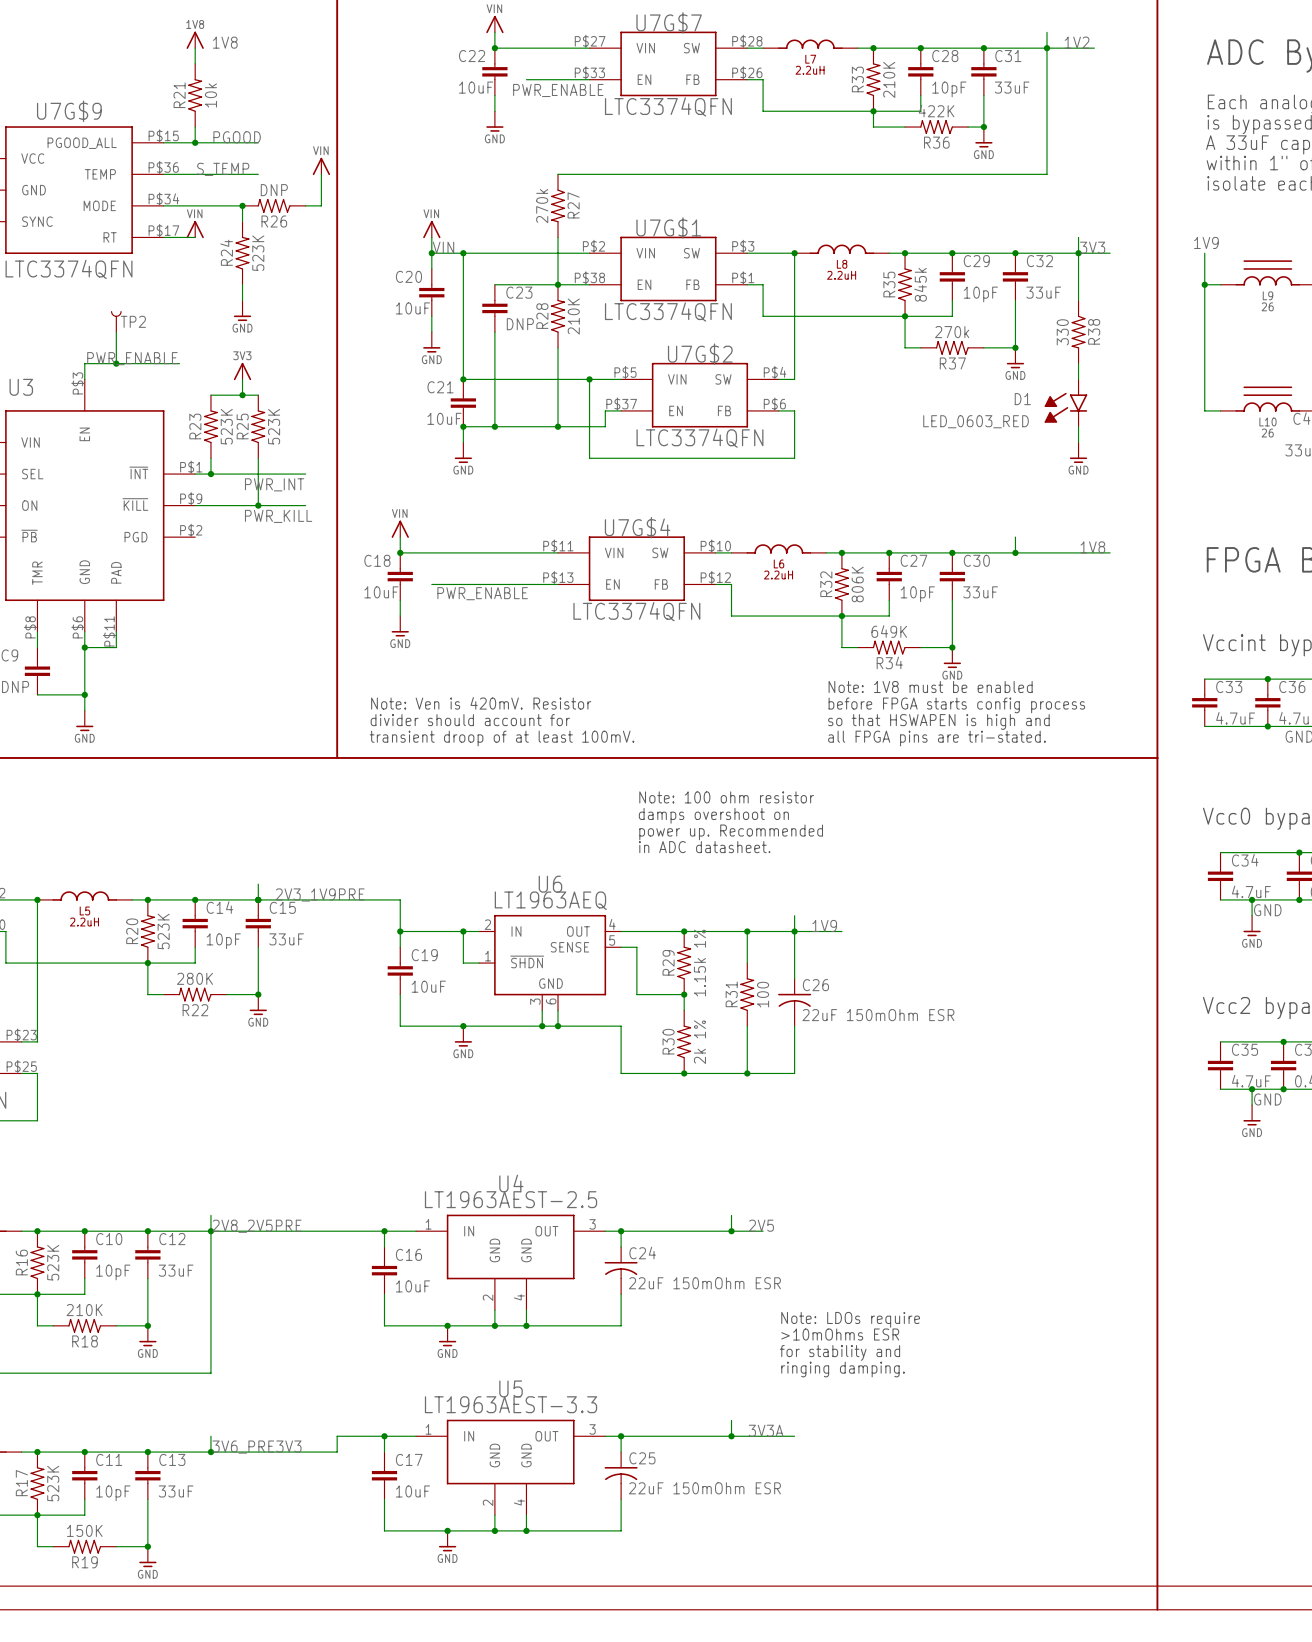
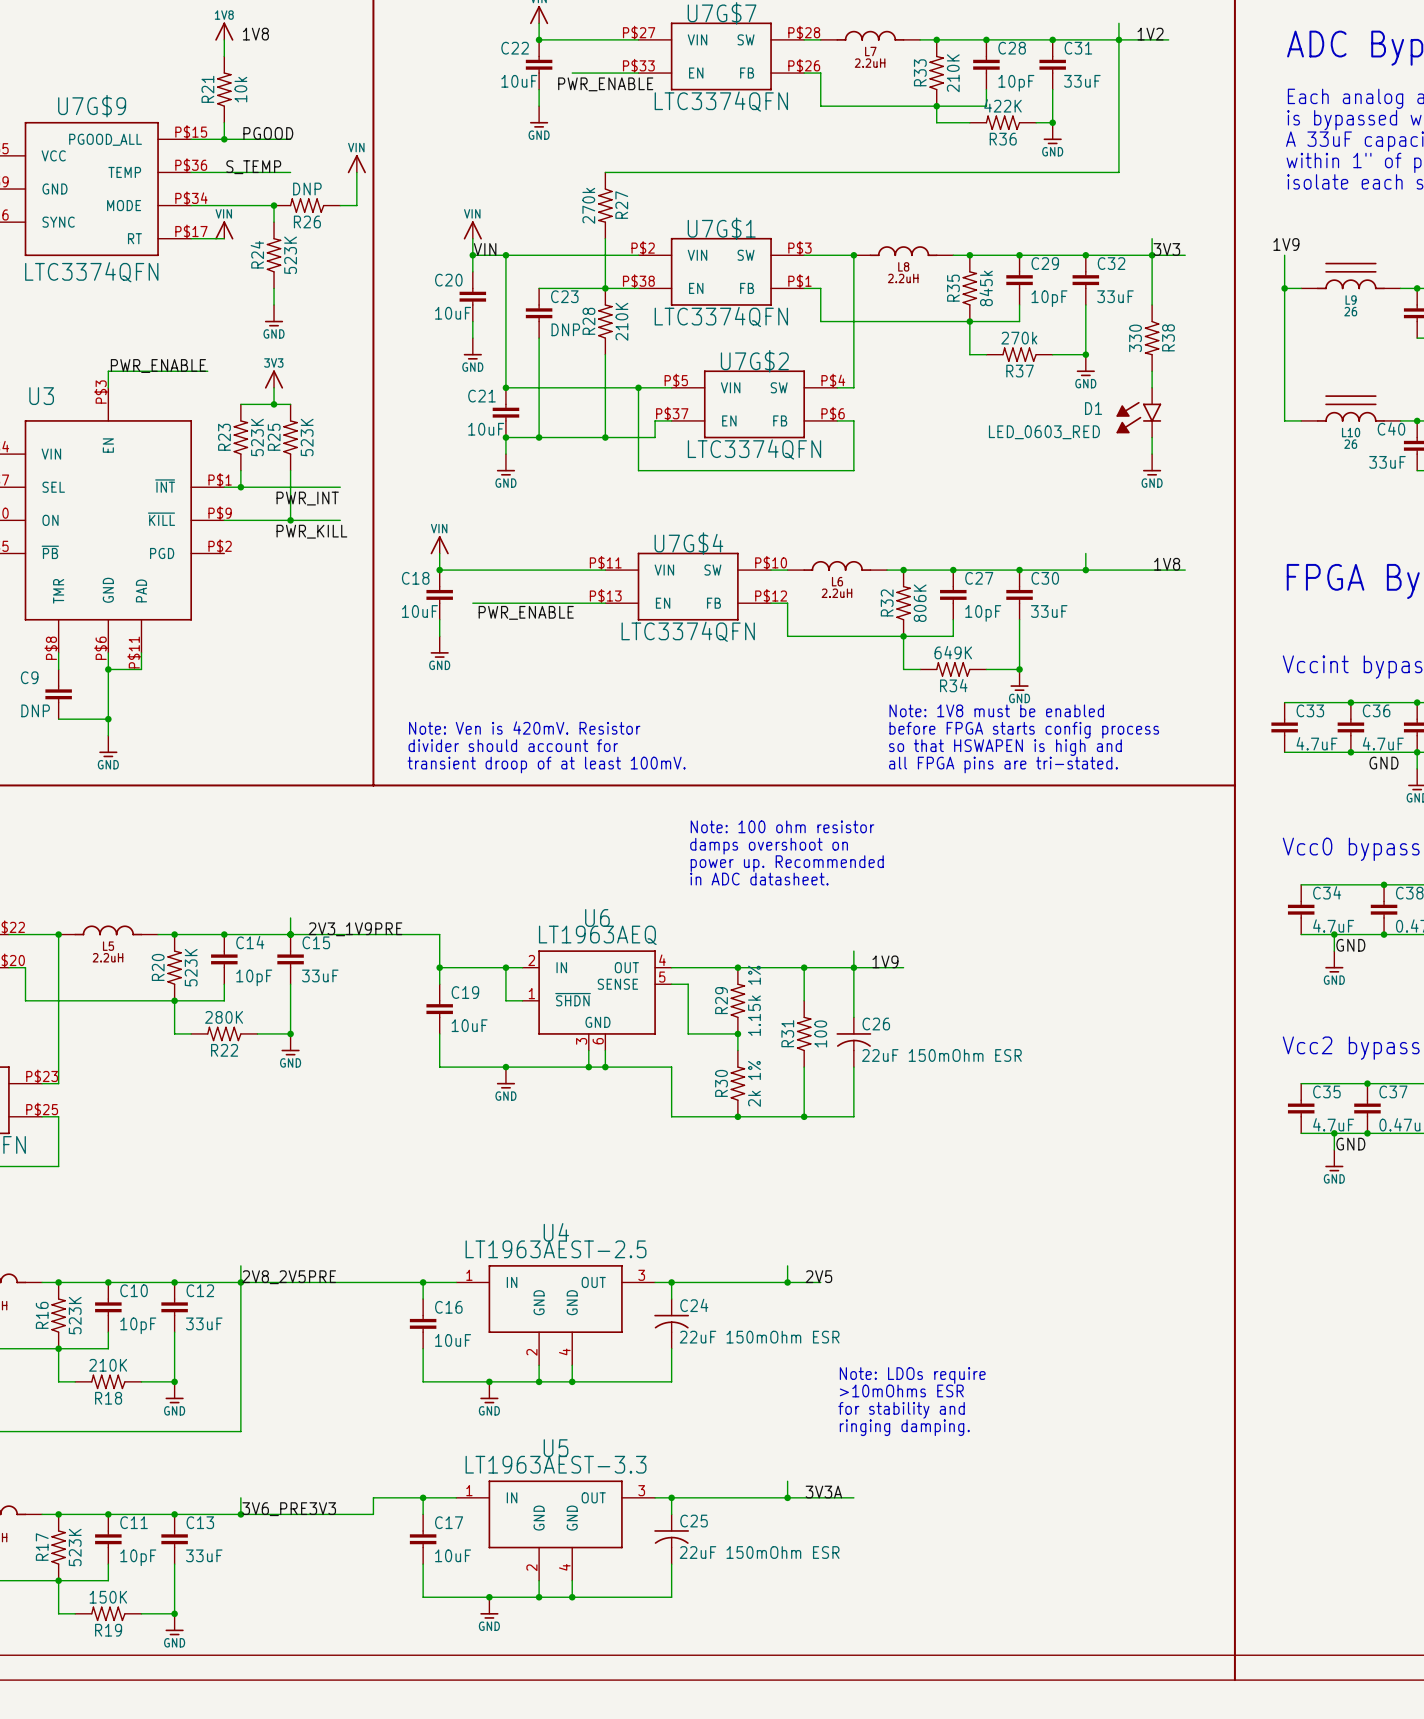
TP2: (116, 321) -> none
wire: (116, 332) (116, 363) -> none
junction: (116, 363) -> none

